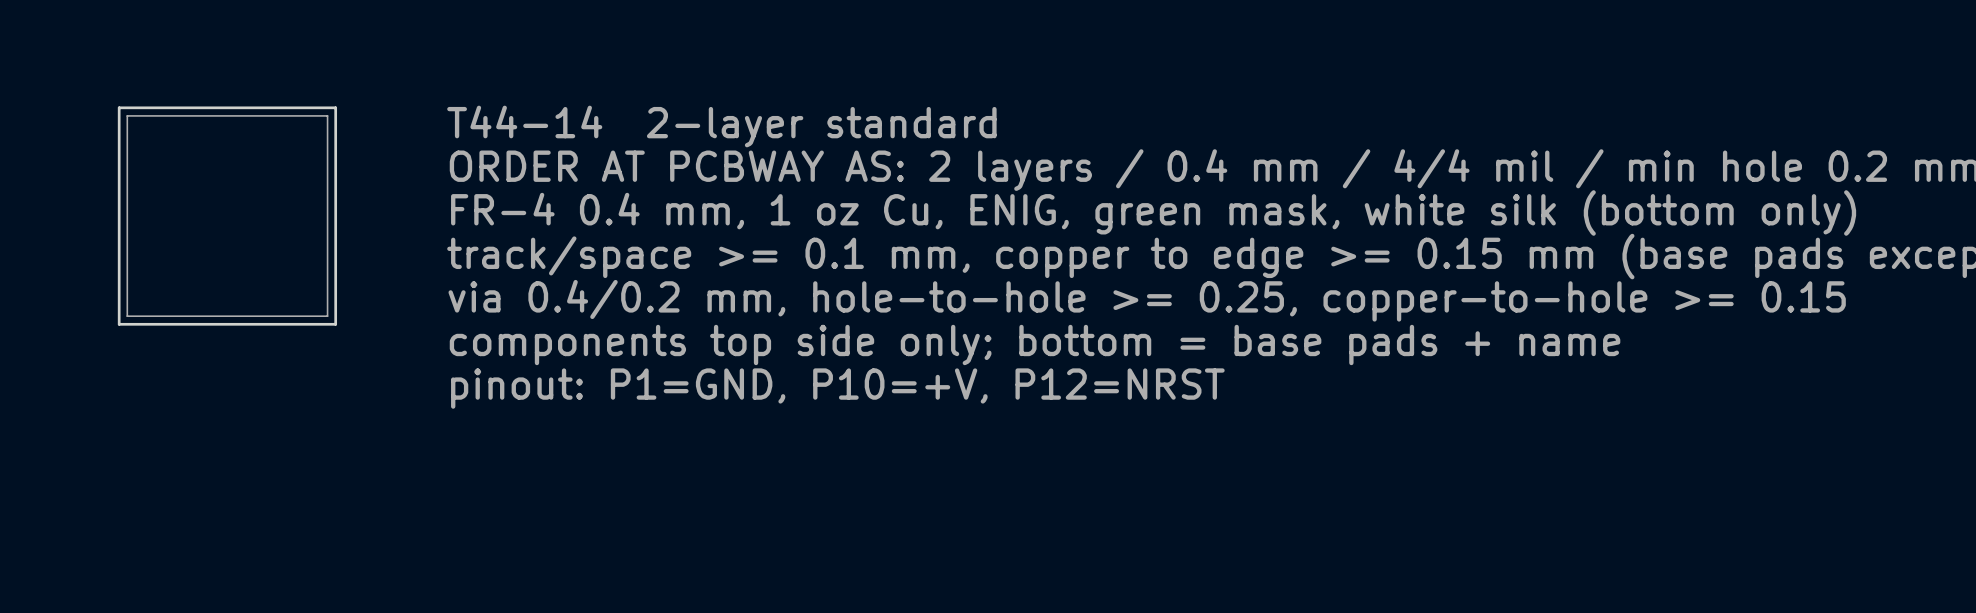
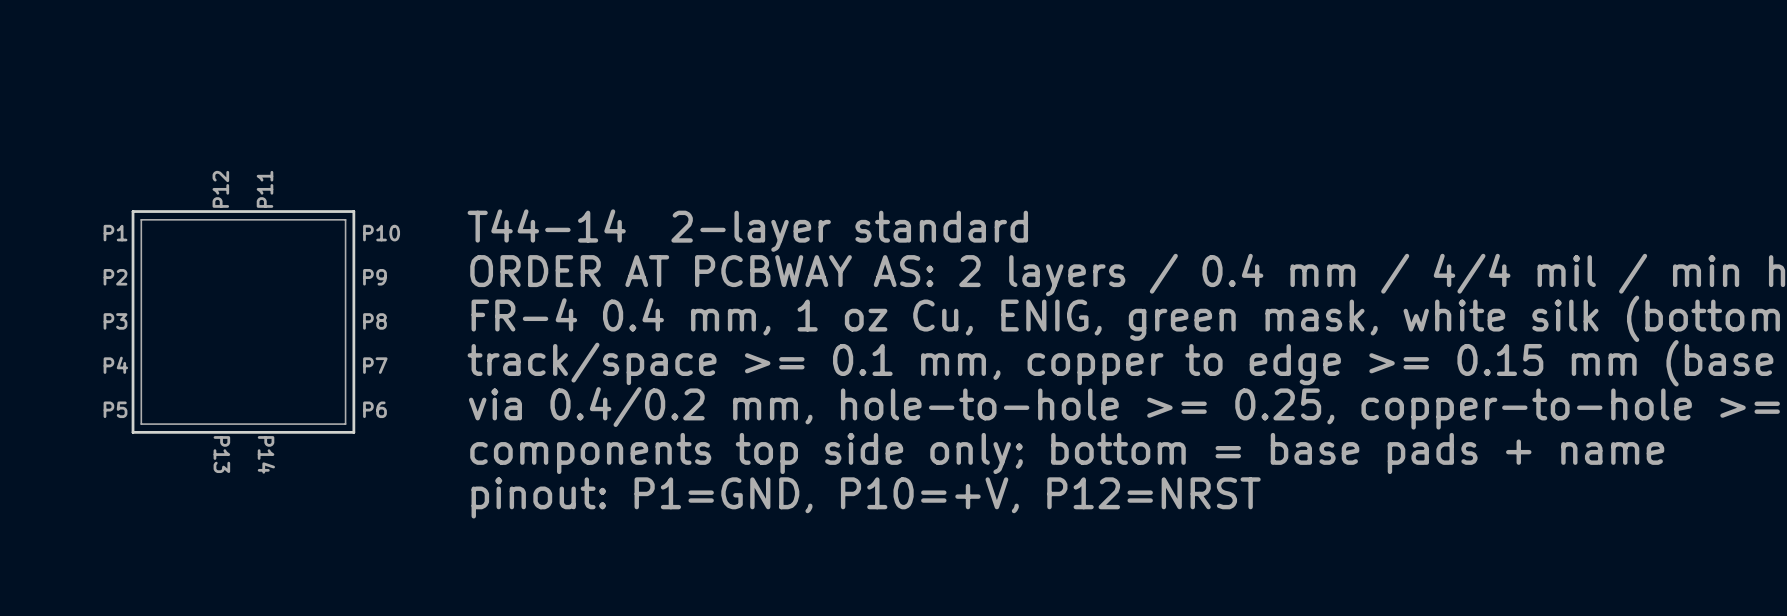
text: none -> P12 (220, 189)
text: none -> P11 (265, 189)
text: none -> P1 (115, 233)
text: none -> P10 (381, 233)
text: none -> P2 (115, 277)
text: none -> P9 (374, 277)
text: none -> P3 (115, 321)
text: none -> P8 (374, 321)
text: none -> P4 (115, 365)
text: none -> P7 (375, 365)
text: none -> P5 (115, 409)
text: none -> P6 (374, 409)
text: none -> P13 (221, 454)
text: none -> P14 (266, 454)

